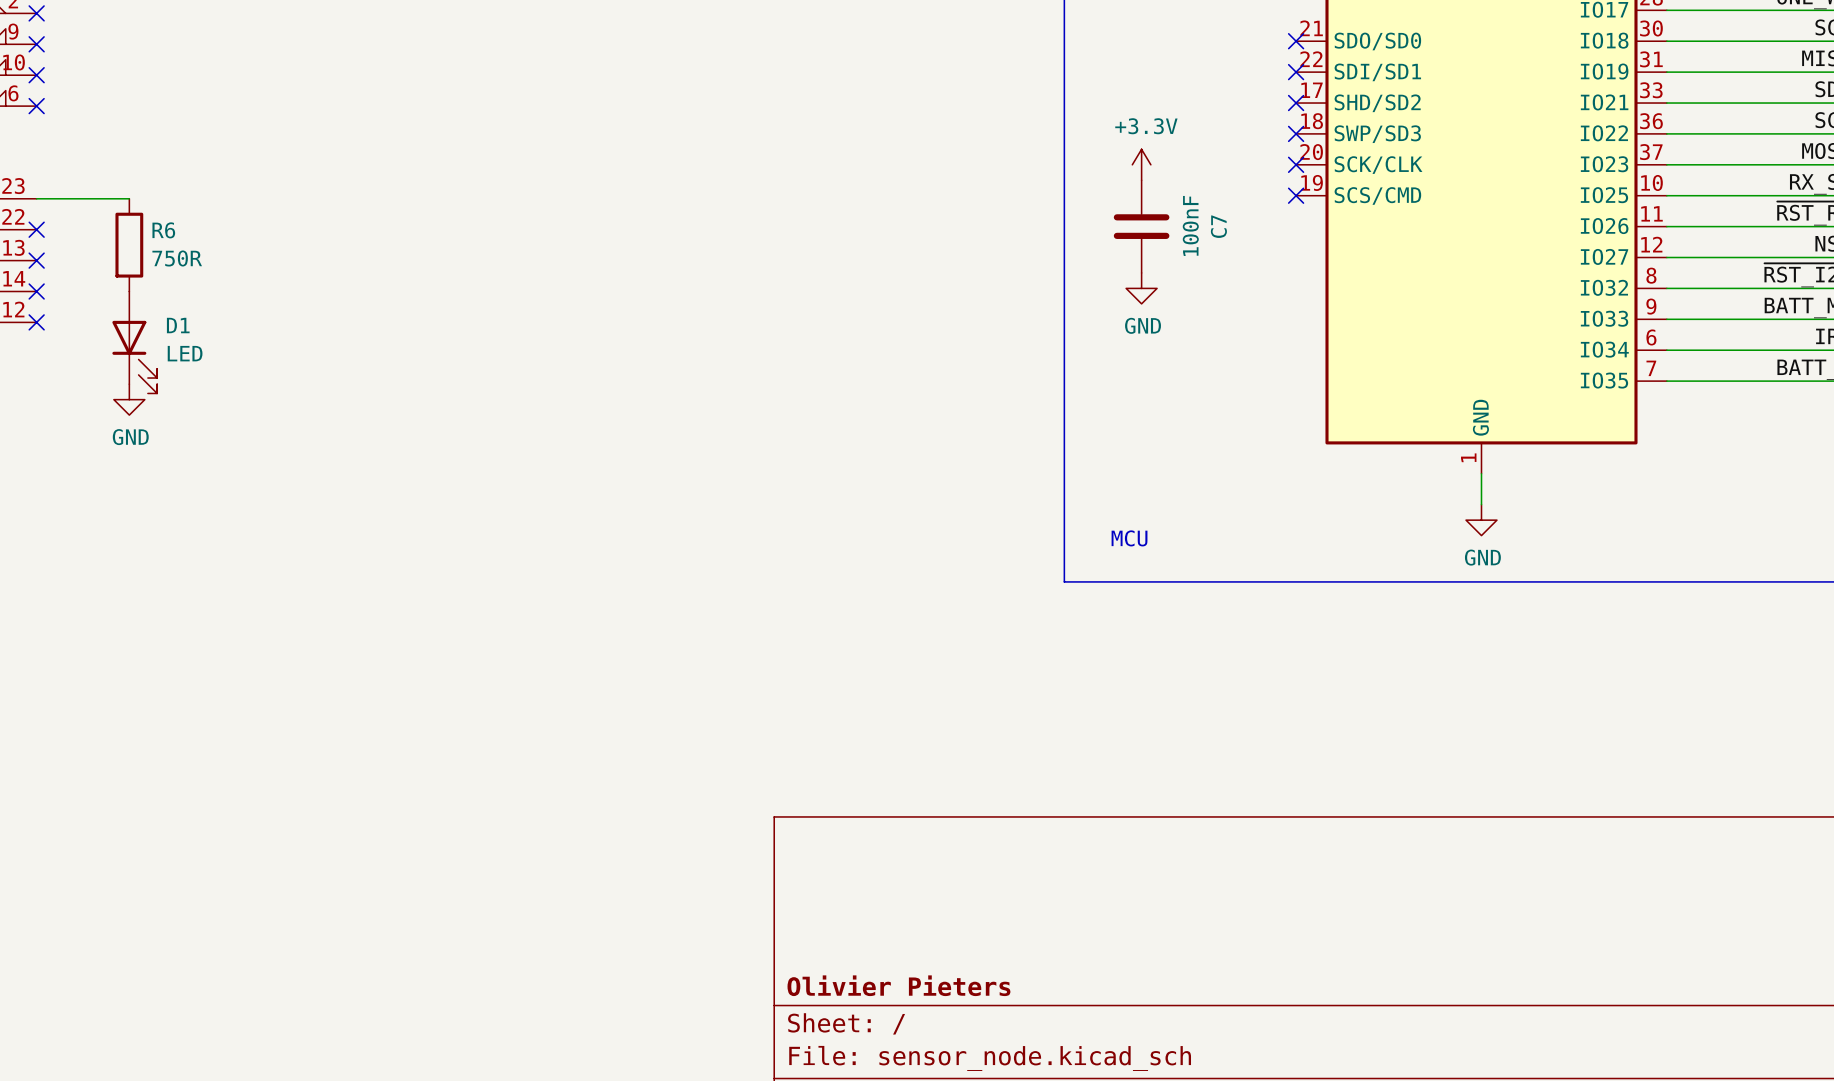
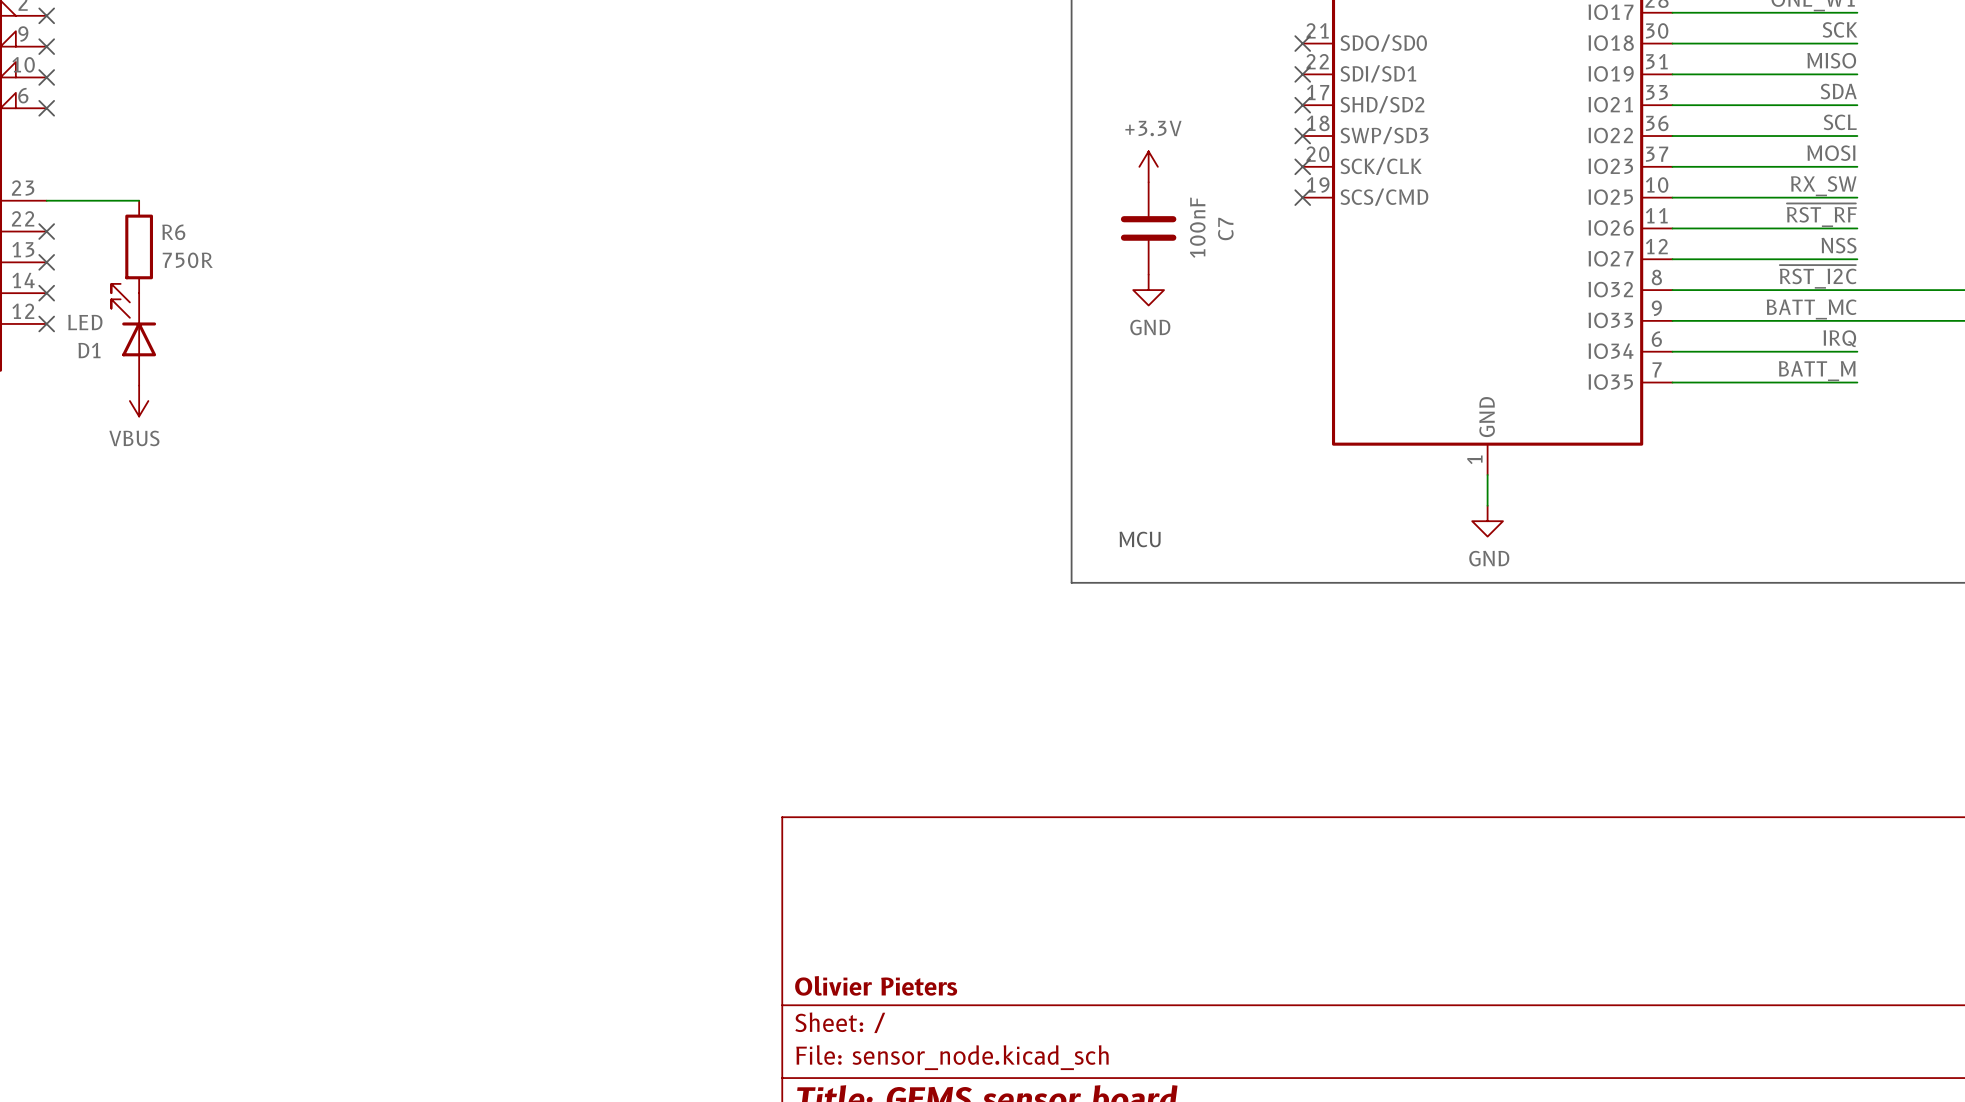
D1 rotation: 0° (134, 357) -> 180° (133, 320)
power symbol: GND (129, 399) -> VBUS (139, 401)

